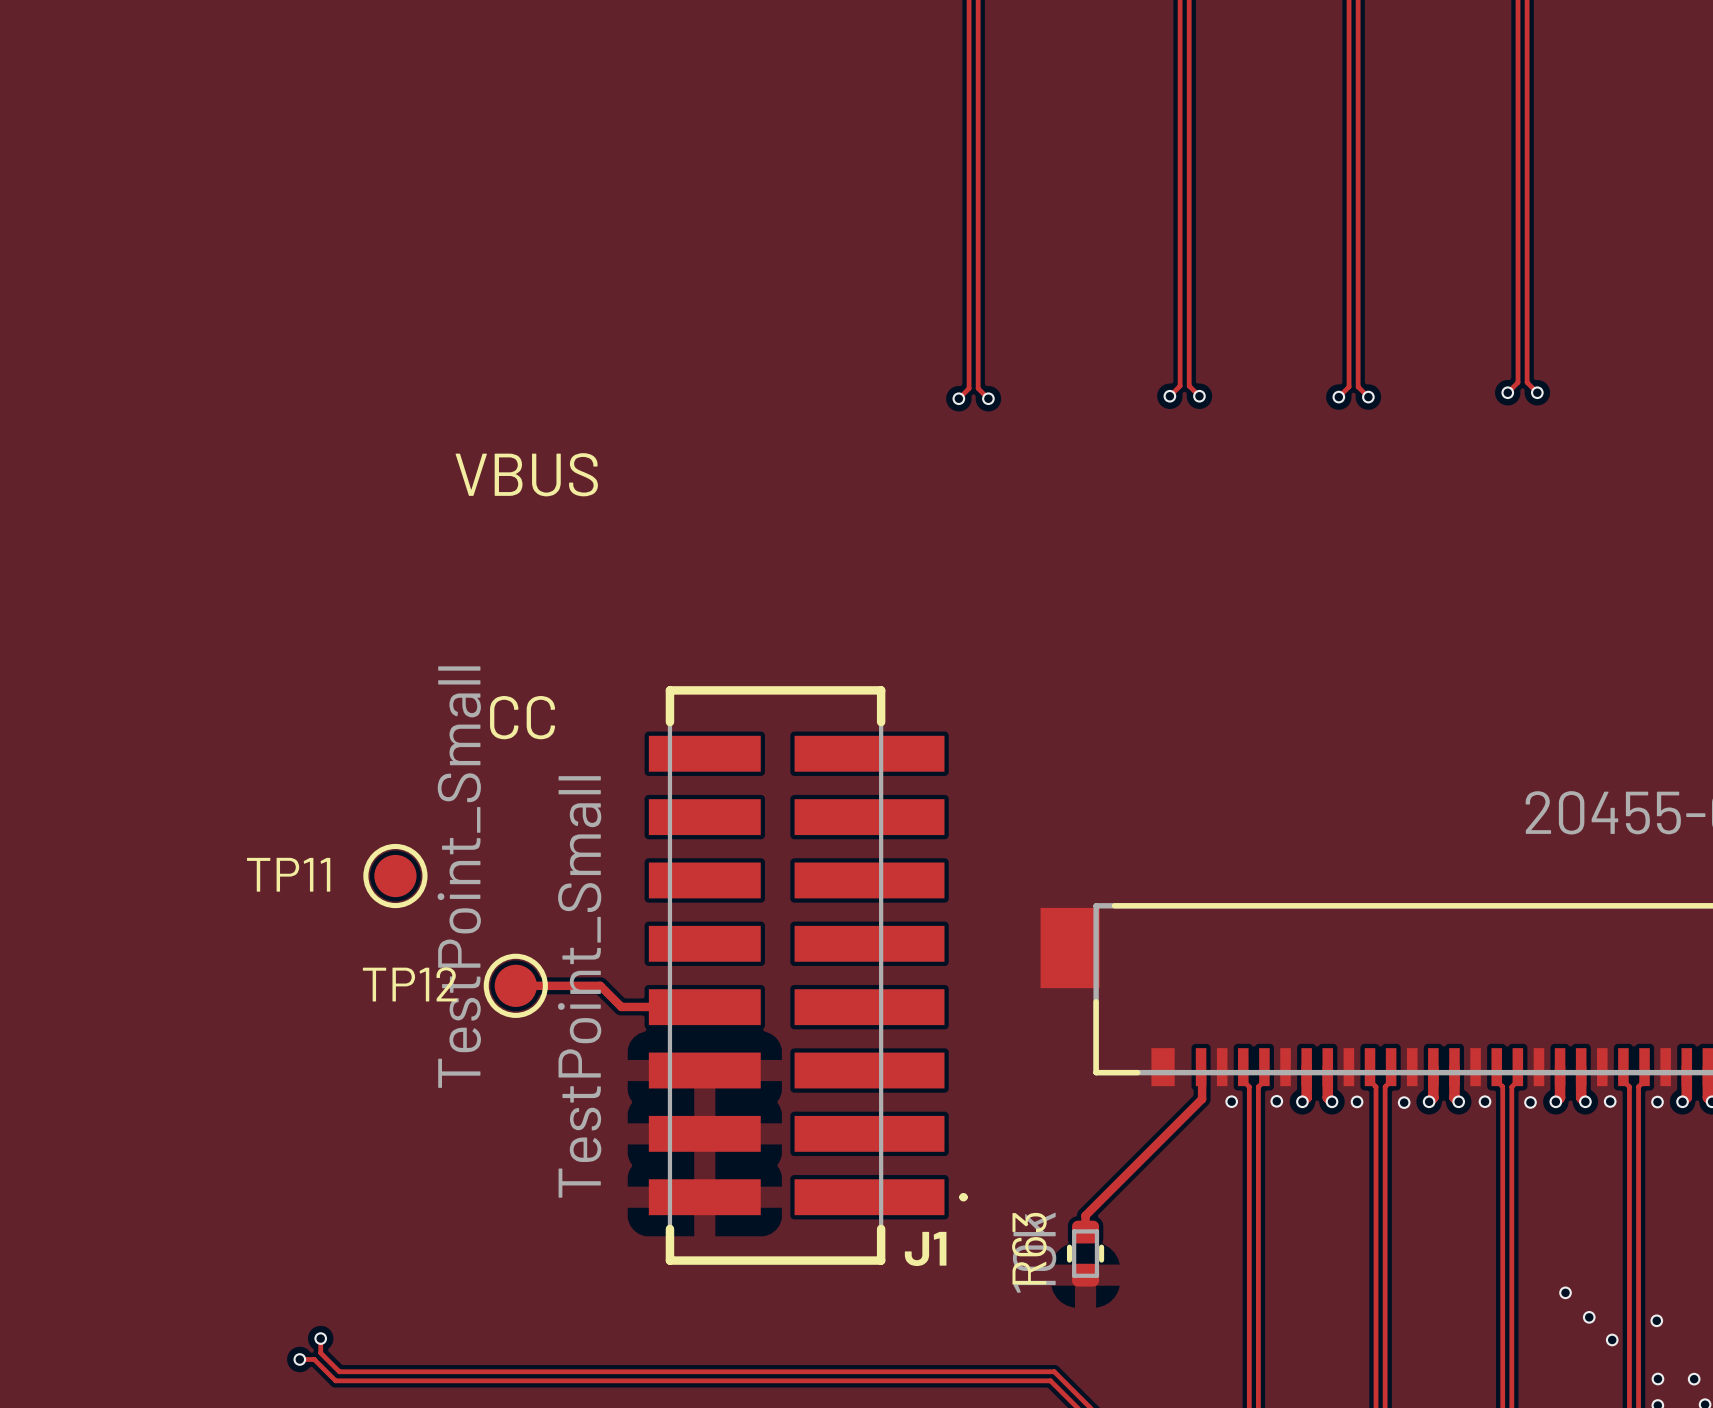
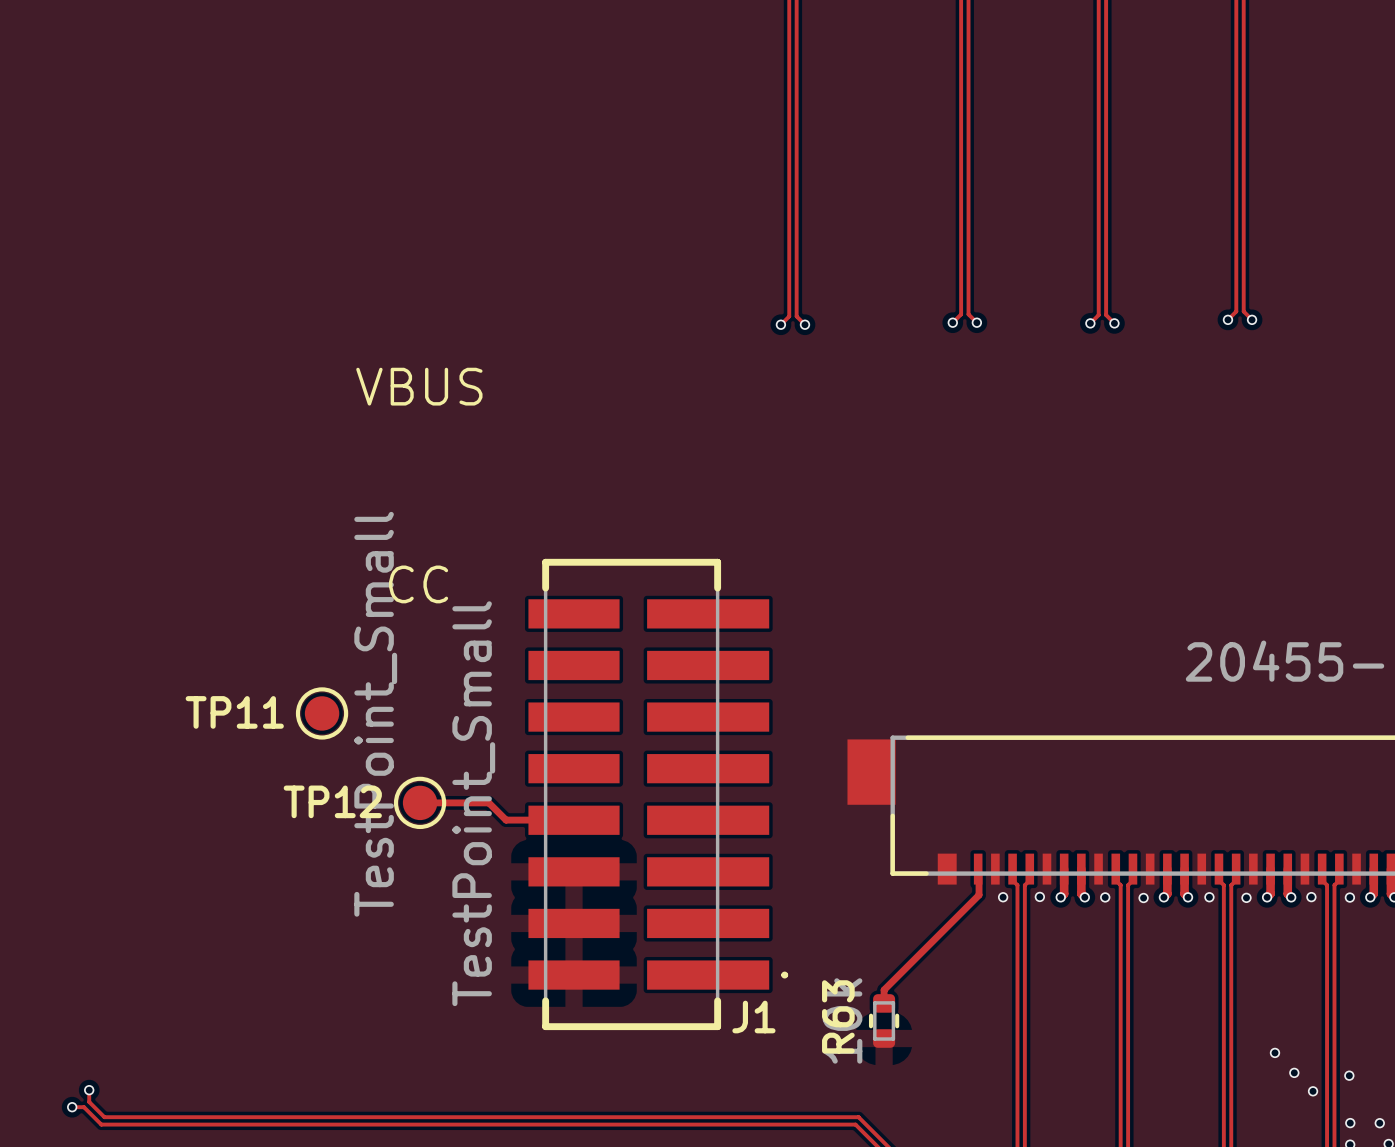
via: none -> (89, 1090)
track: (320, 1338) (320, 1353) (339, 1371) -> (89, 1090) (89, 1101) (104, 1117) (276, 1117)
via: (320, 1338) -> none
via: none -> (72, 1107)
track: (299, 1359) (314, 1359) (335, 1380) -> (72, 1107) (83, 1107) (101, 1124) (273, 1124)
via: (299, 1359) -> none

